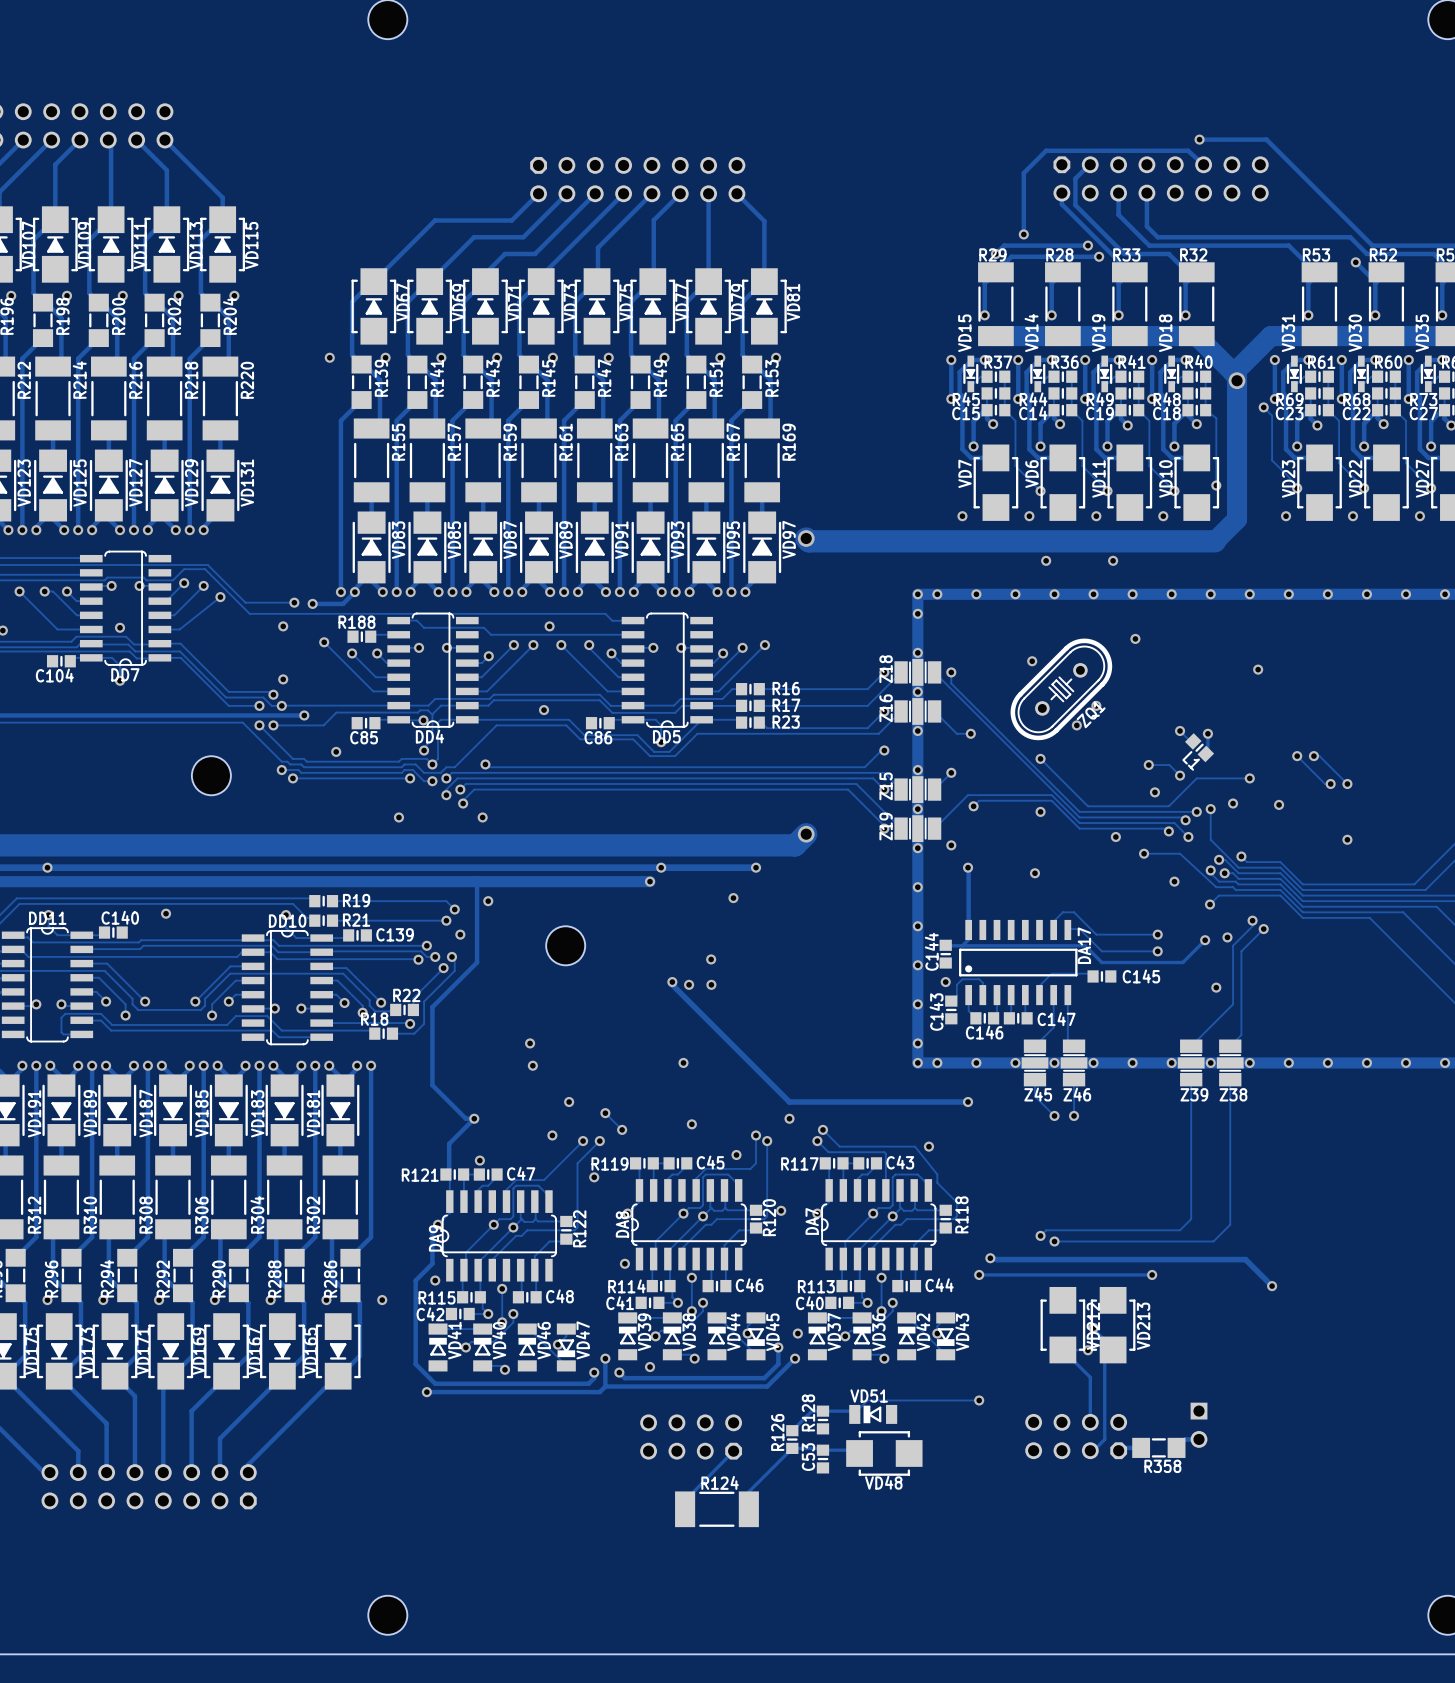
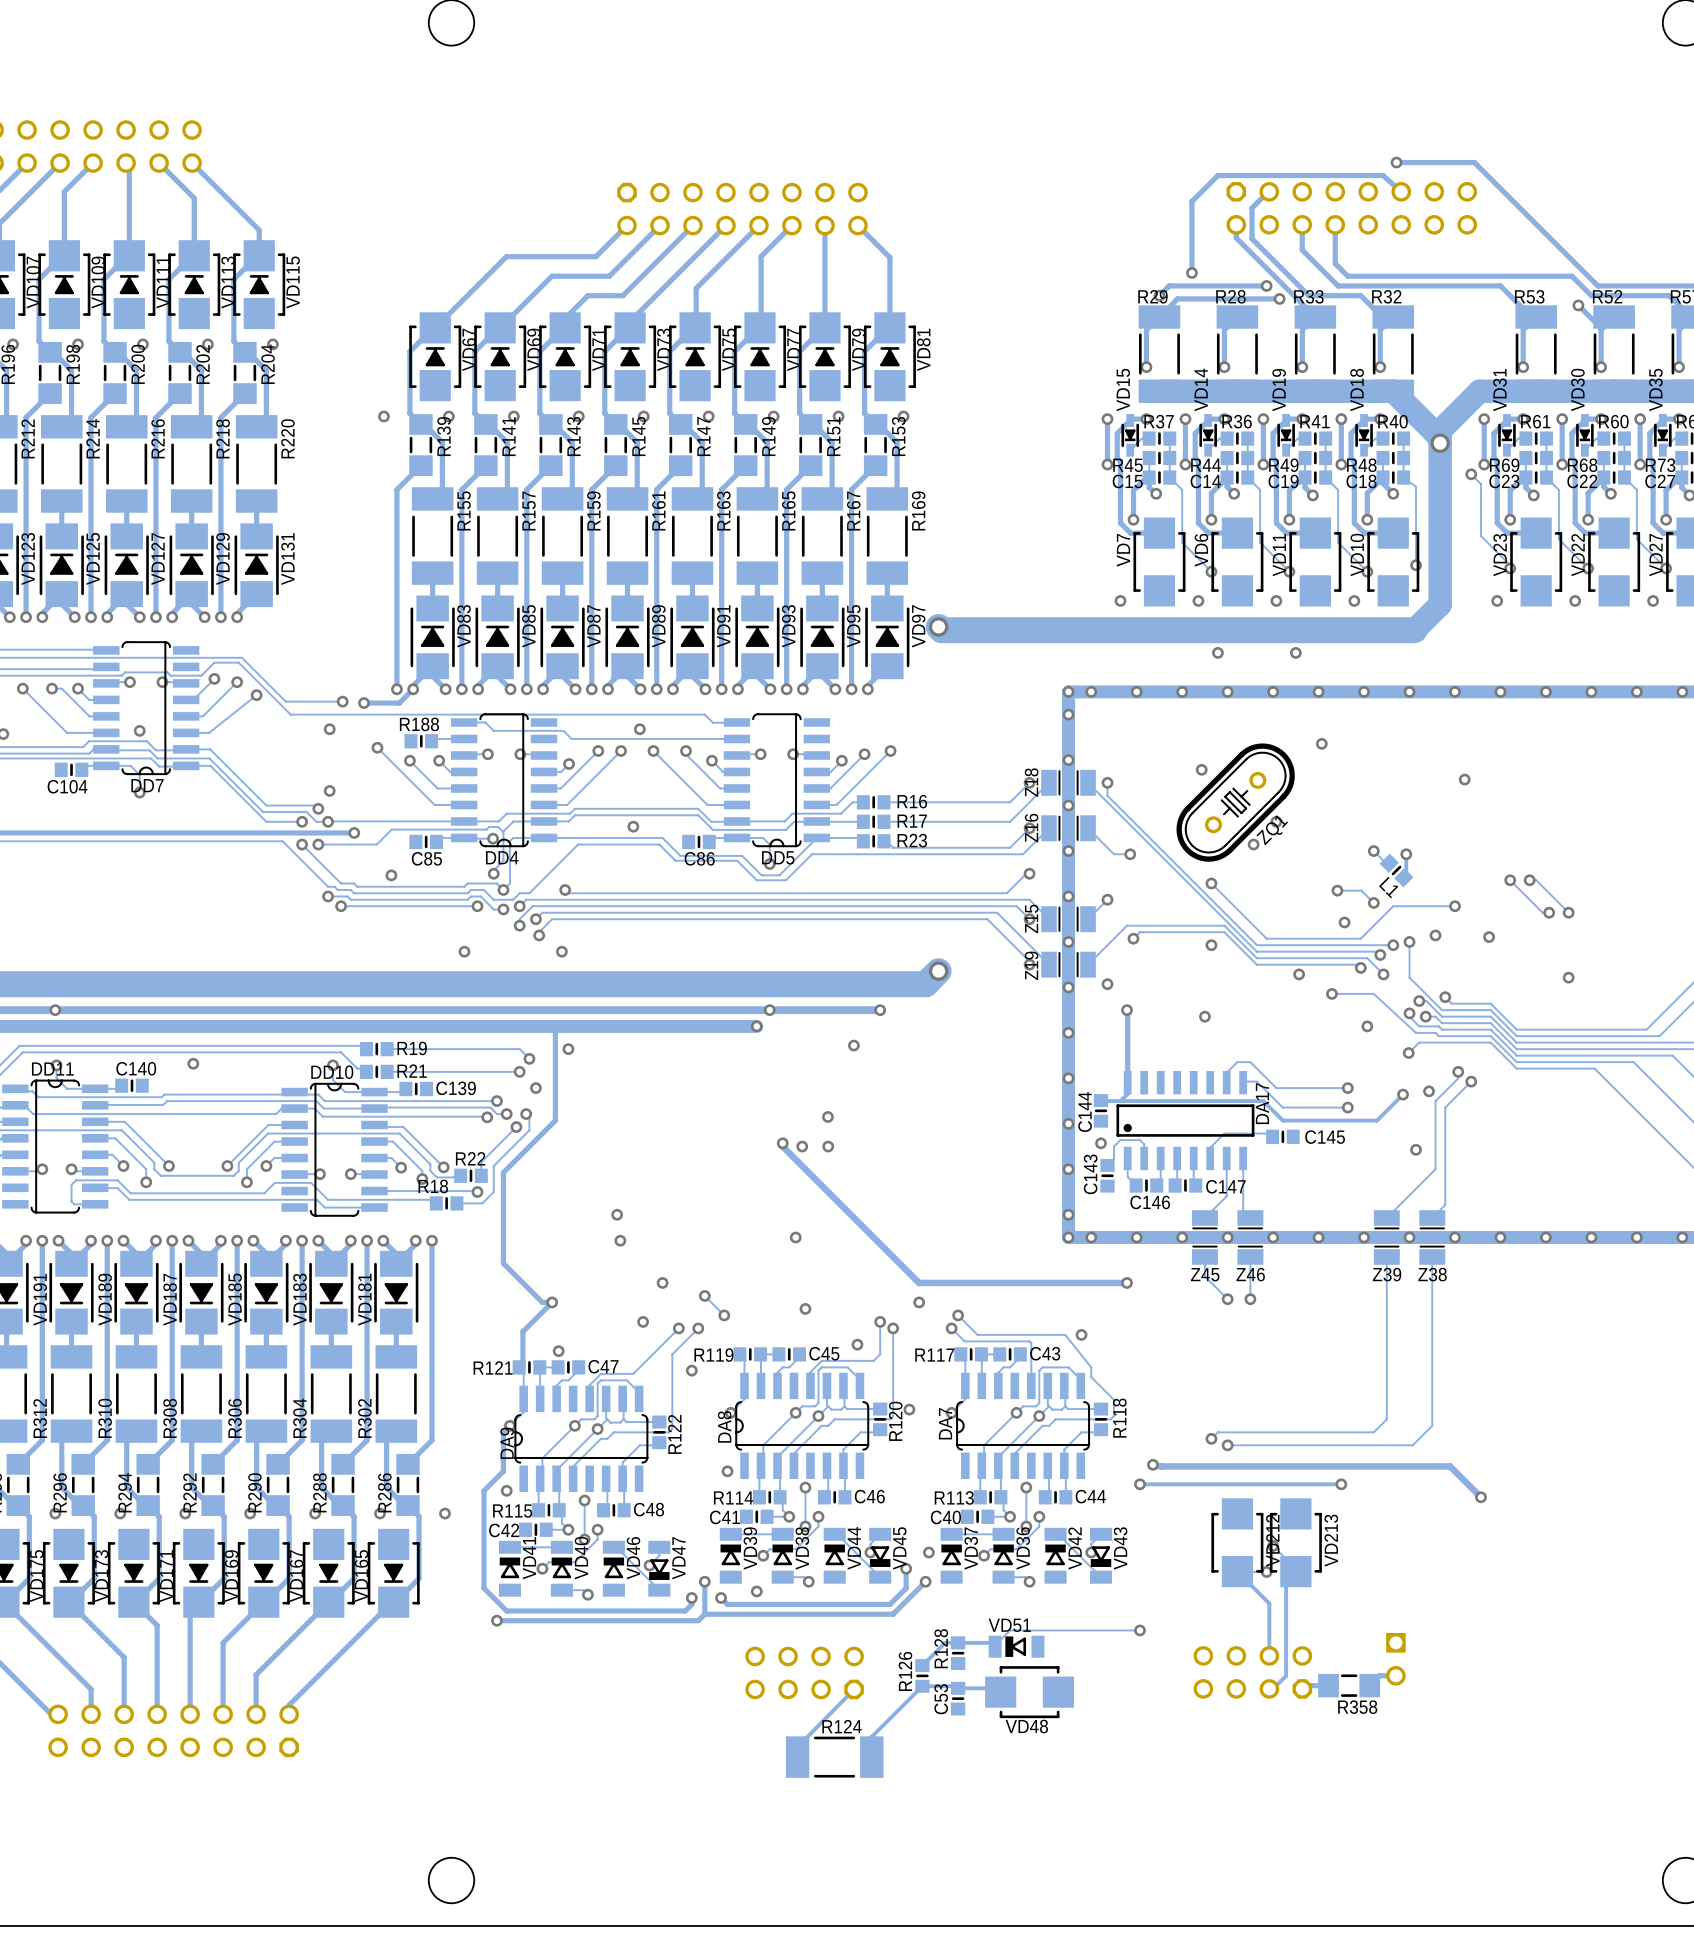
part: (211, 775) -> none
part: (565, 945) -> none

